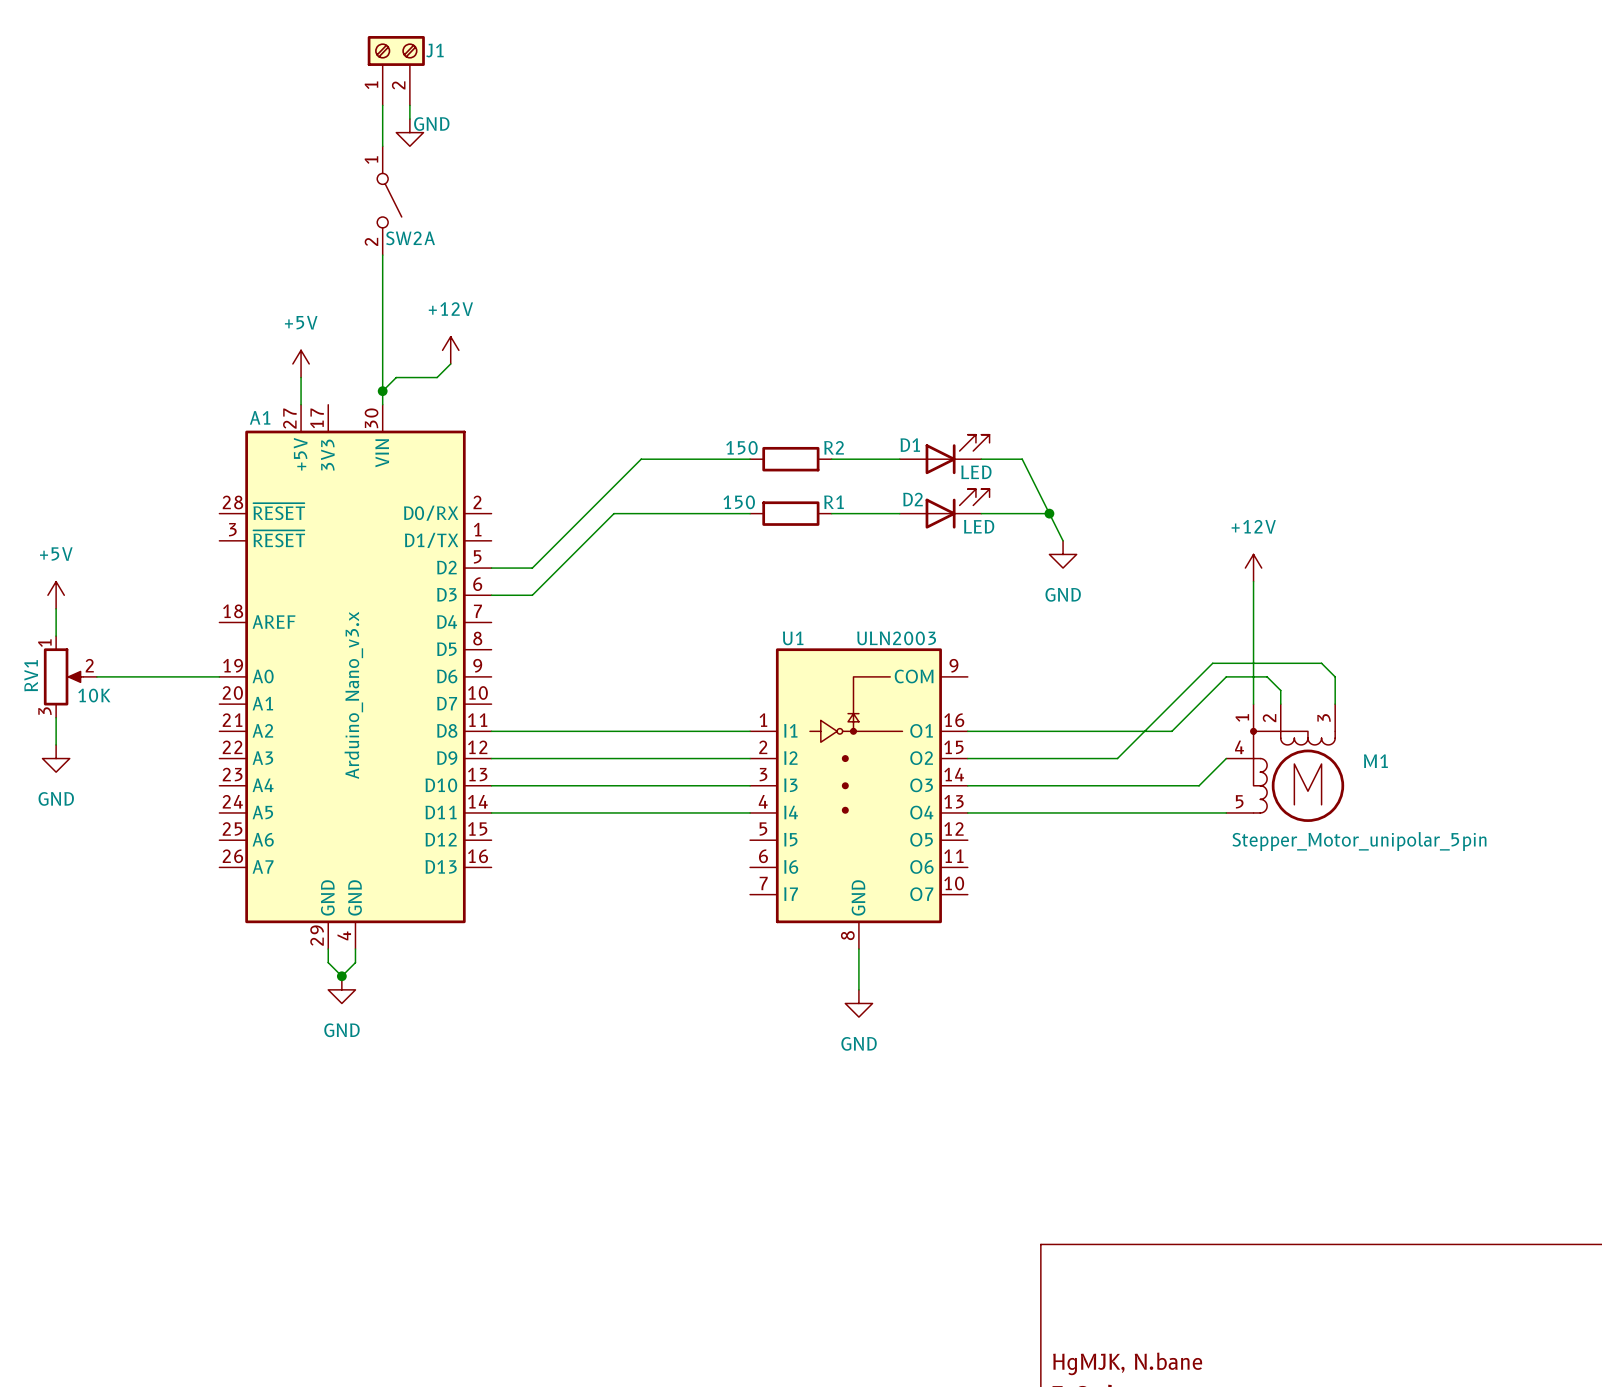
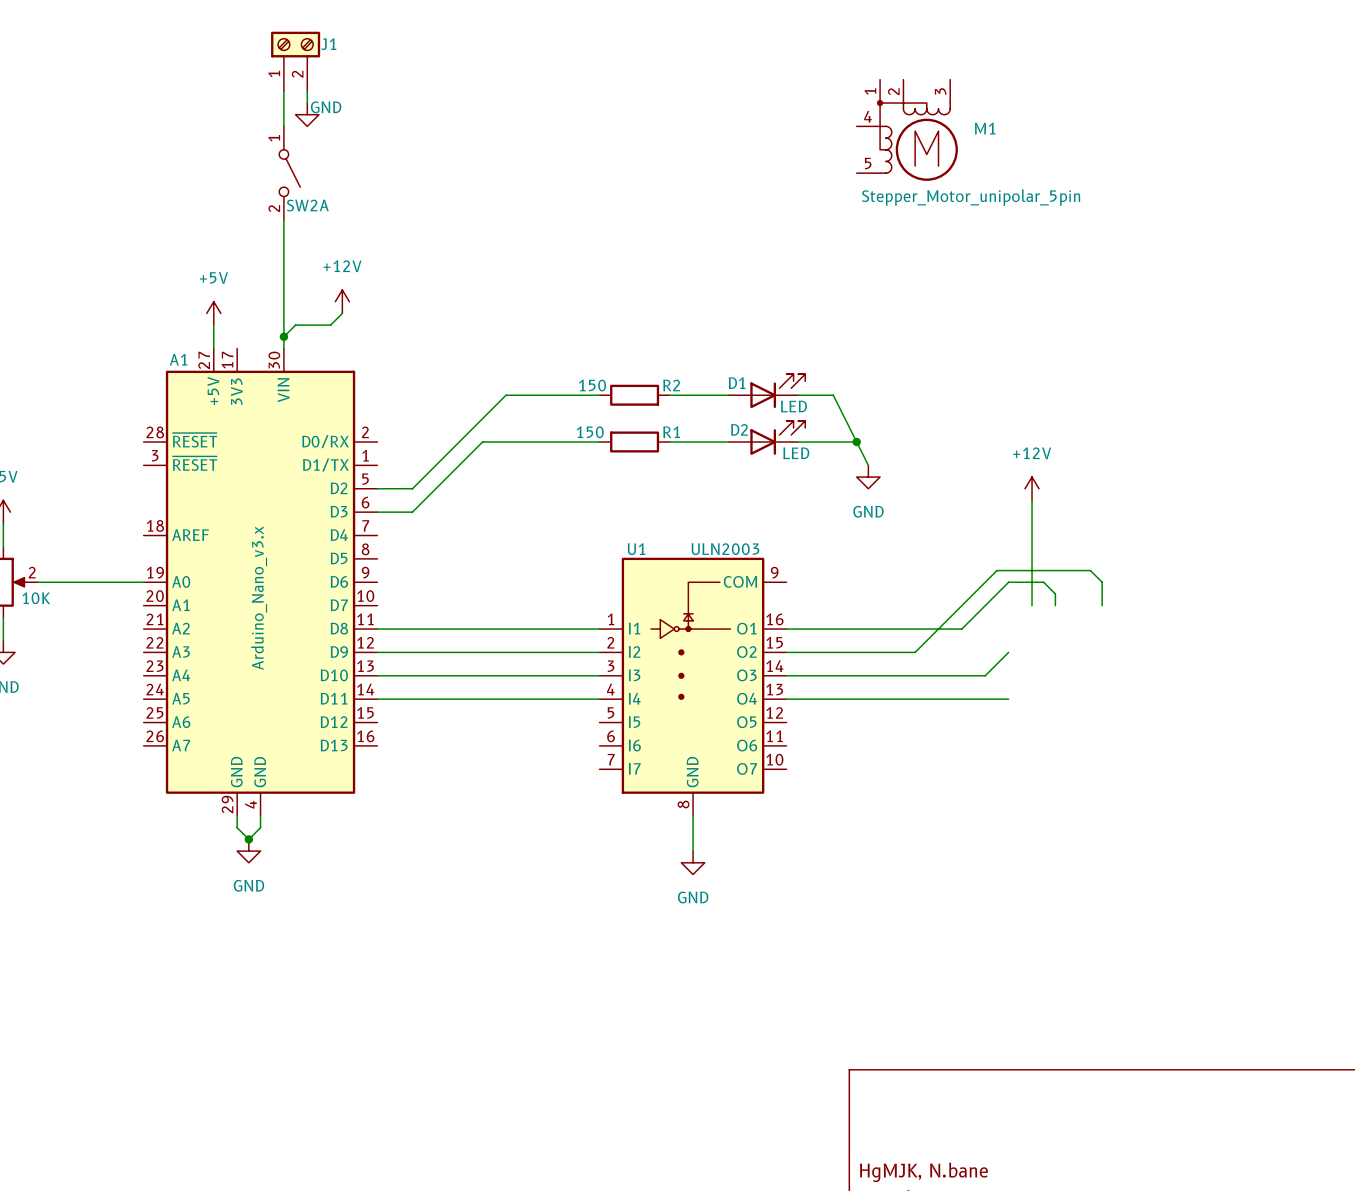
M1 position: (1285, 763) -> (907, 130)

